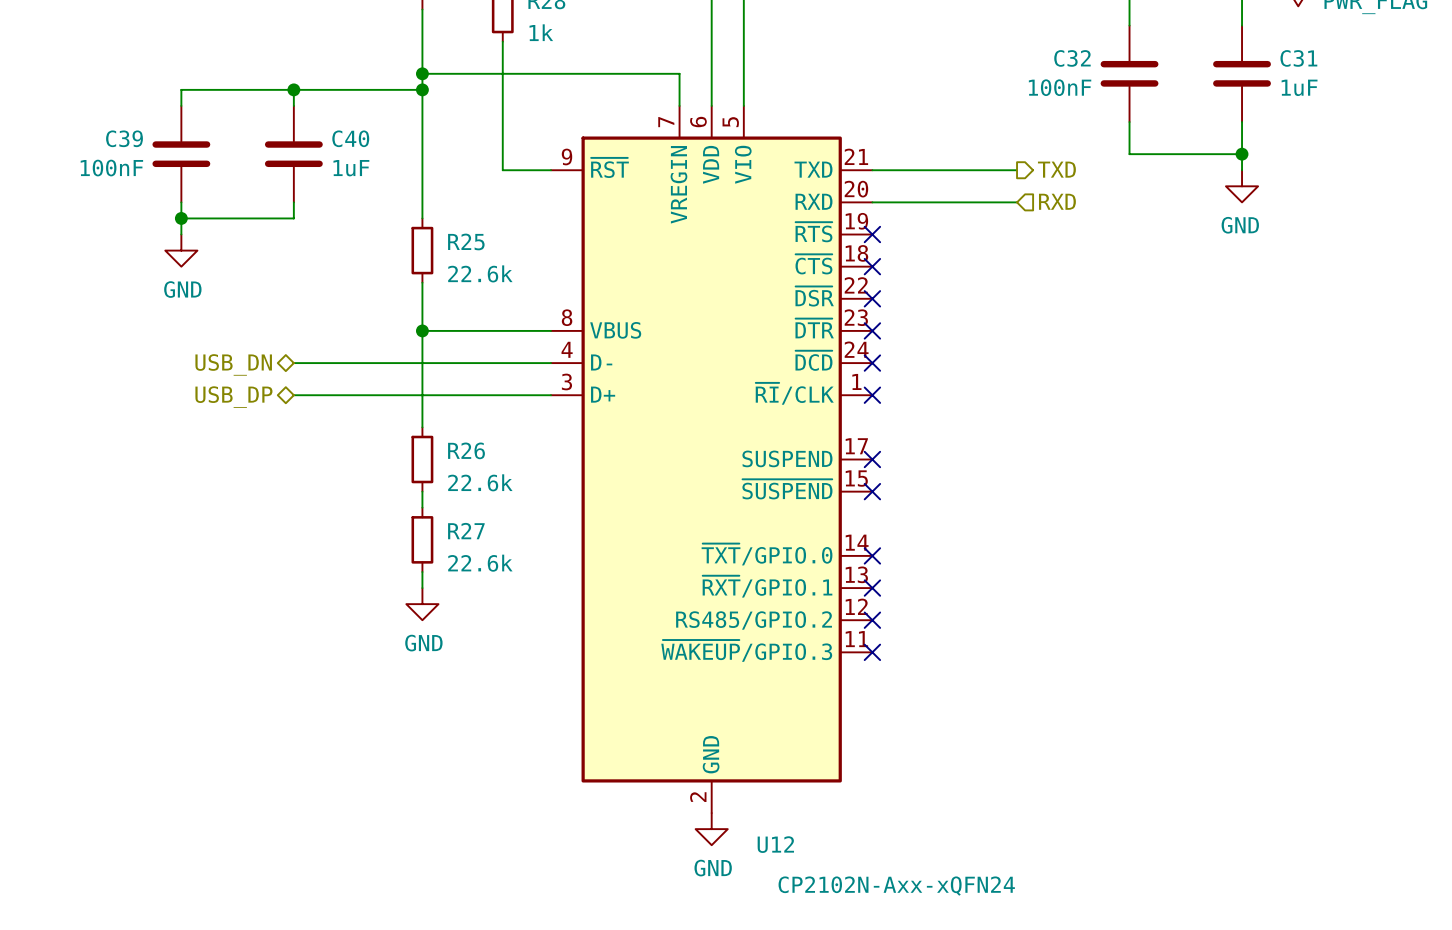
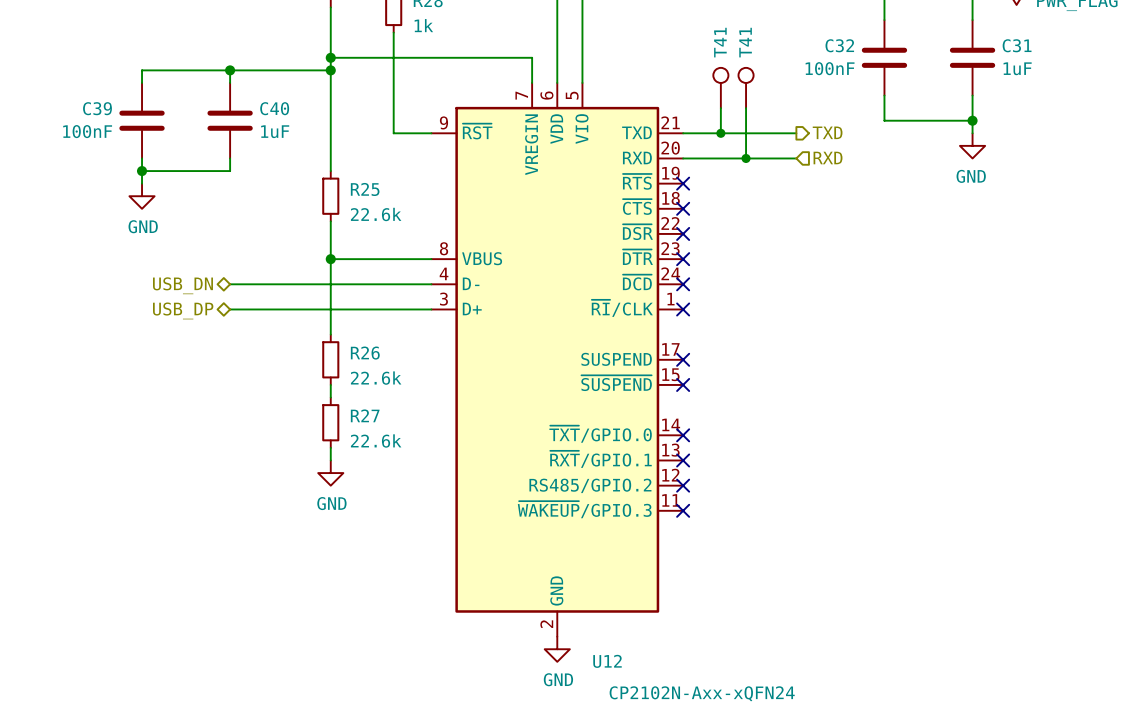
T41: none -> (720, 88)
T41: none -> (746, 88)
wire: none -> (720, 108) (720, 133)
wire: none -> (746, 108) (746, 158)
junction: none -> (720, 133)
junction: none -> (746, 158)

